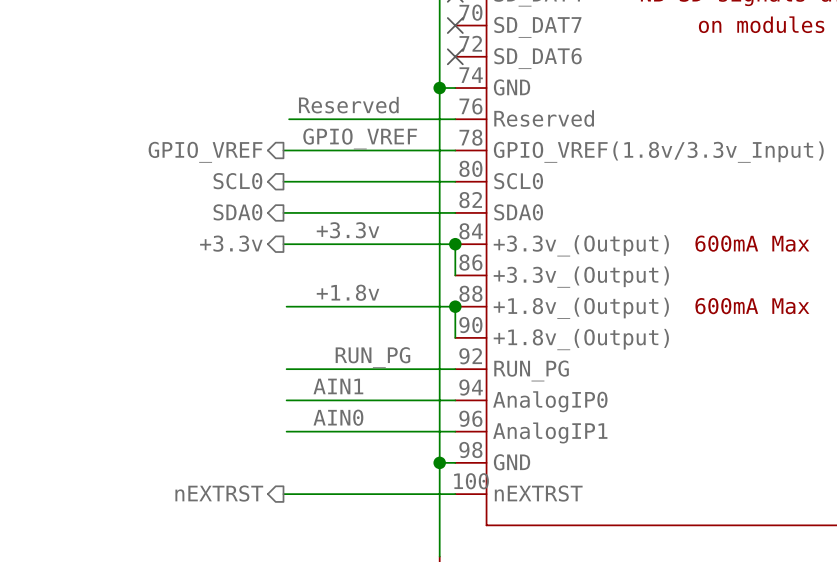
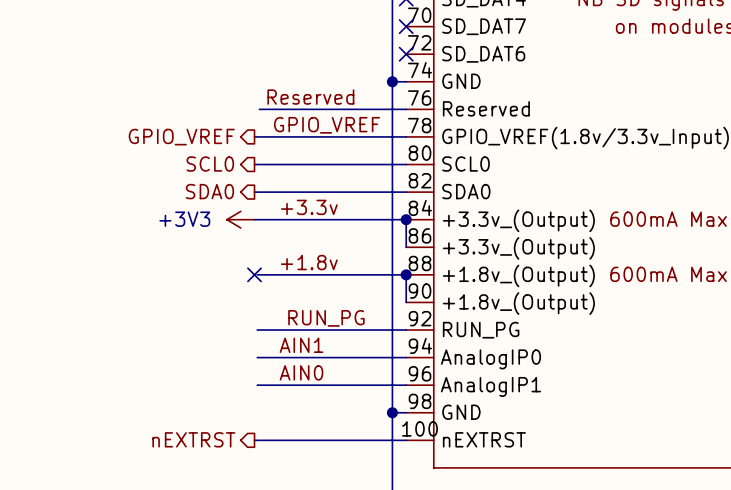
hierarchical label: +3.3v (231, 243) -> none
power symbol: none -> +3V3 (240, 219)
no-connect mark: none -> (254, 274)

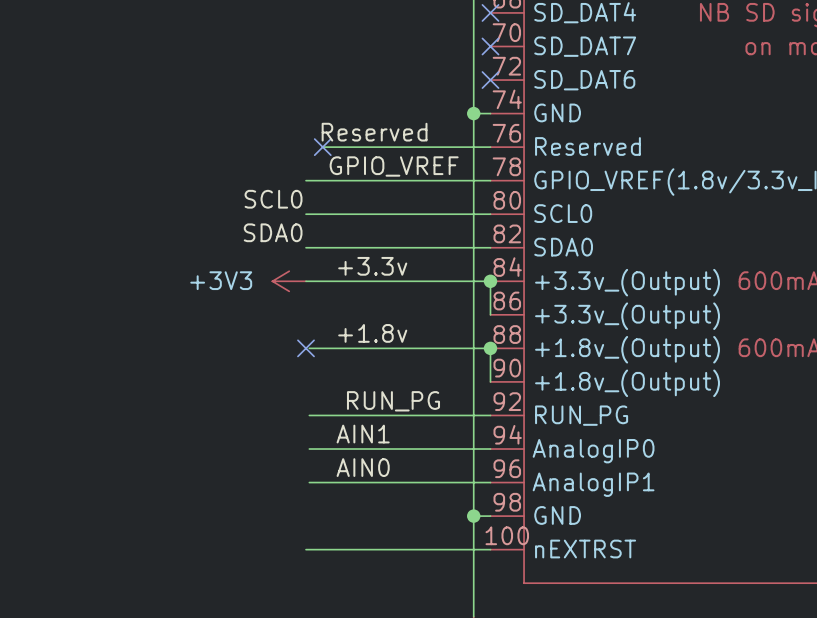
wire: (259, 109) (268, 109) -> none
no-connect mark: none -> (322, 147)
hierarchical label: GPIO_VREF (181, 137) -> none
label: none -> SCL0 (273, 199)
hierarchical label: SCL0 (210, 164) -> none
label: none -> SDA0 (273, 232)
hierarchical label: SDA0 (209, 191) -> none
hierarchical label: nEXTRST (193, 439) -> none

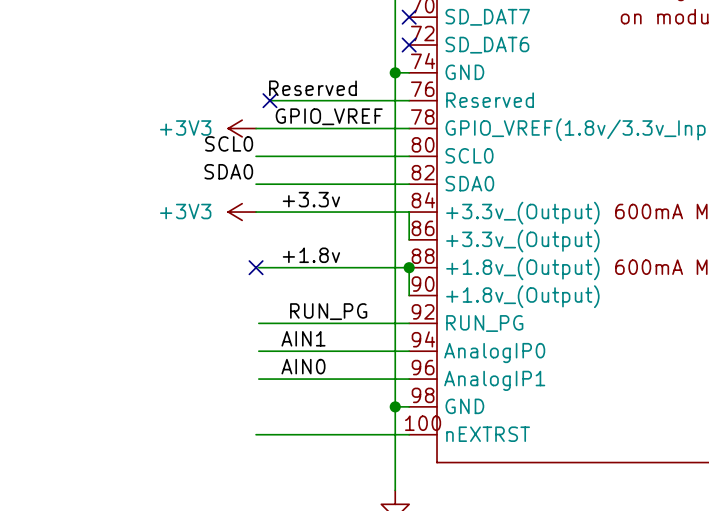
power symbol: none -> +3V3 (242, 128)
junction: (490, 281) -> none

